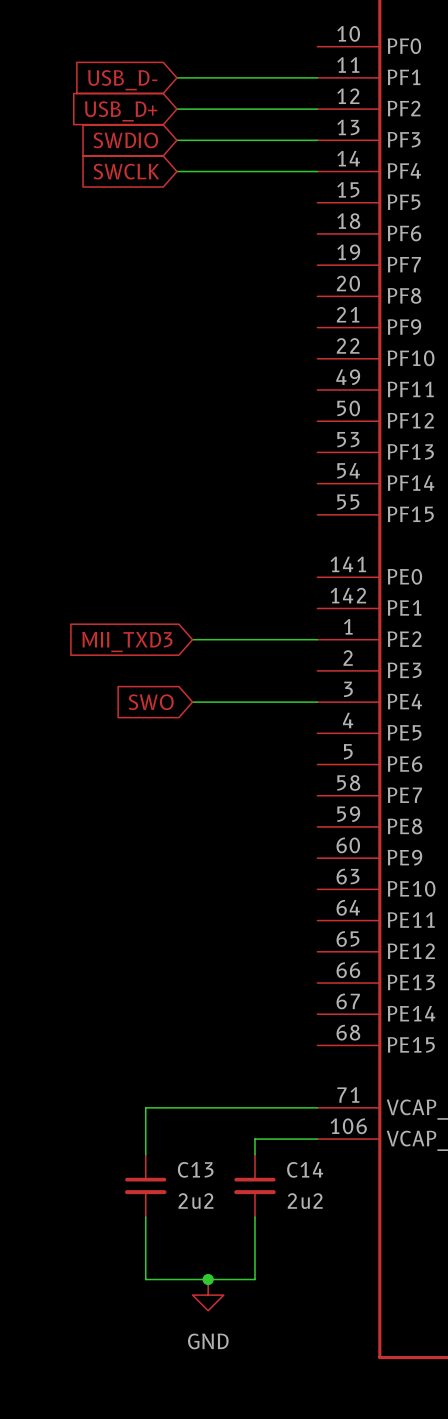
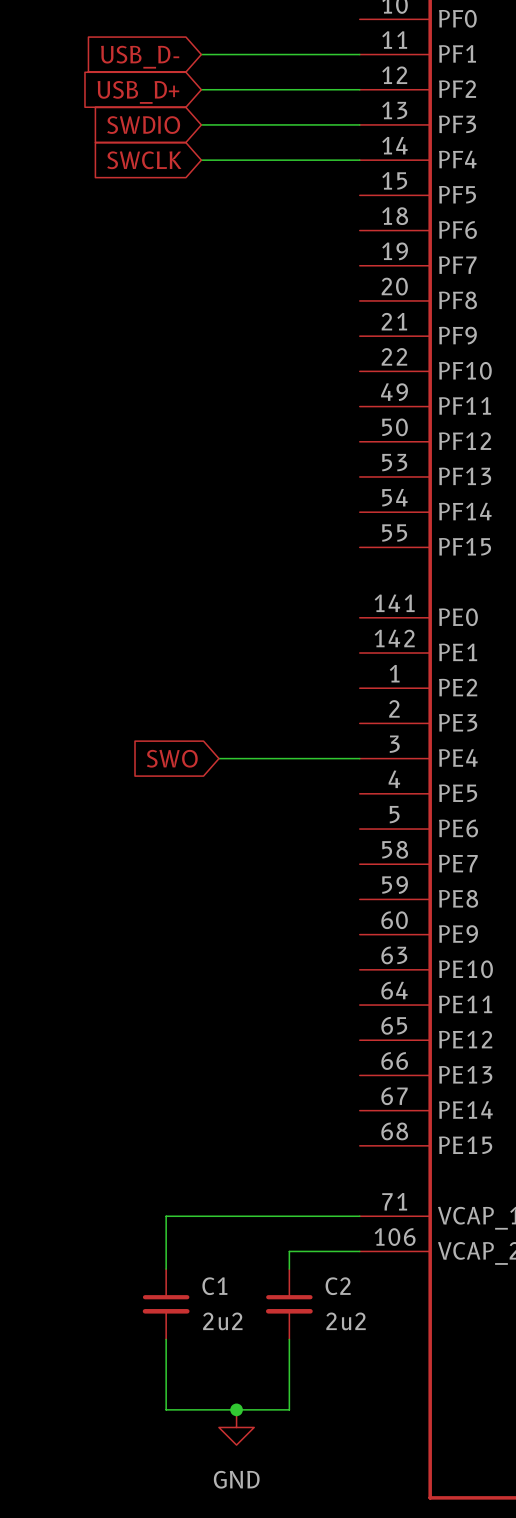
wire: (192, 639) (317, 639) -> none
global label: MII_TXD3 (127, 642) -> none
C13 name: C13 (195, 1169) -> C1 (214, 1286)
C14 name: C14 (305, 1169) -> C2 (338, 1286)

